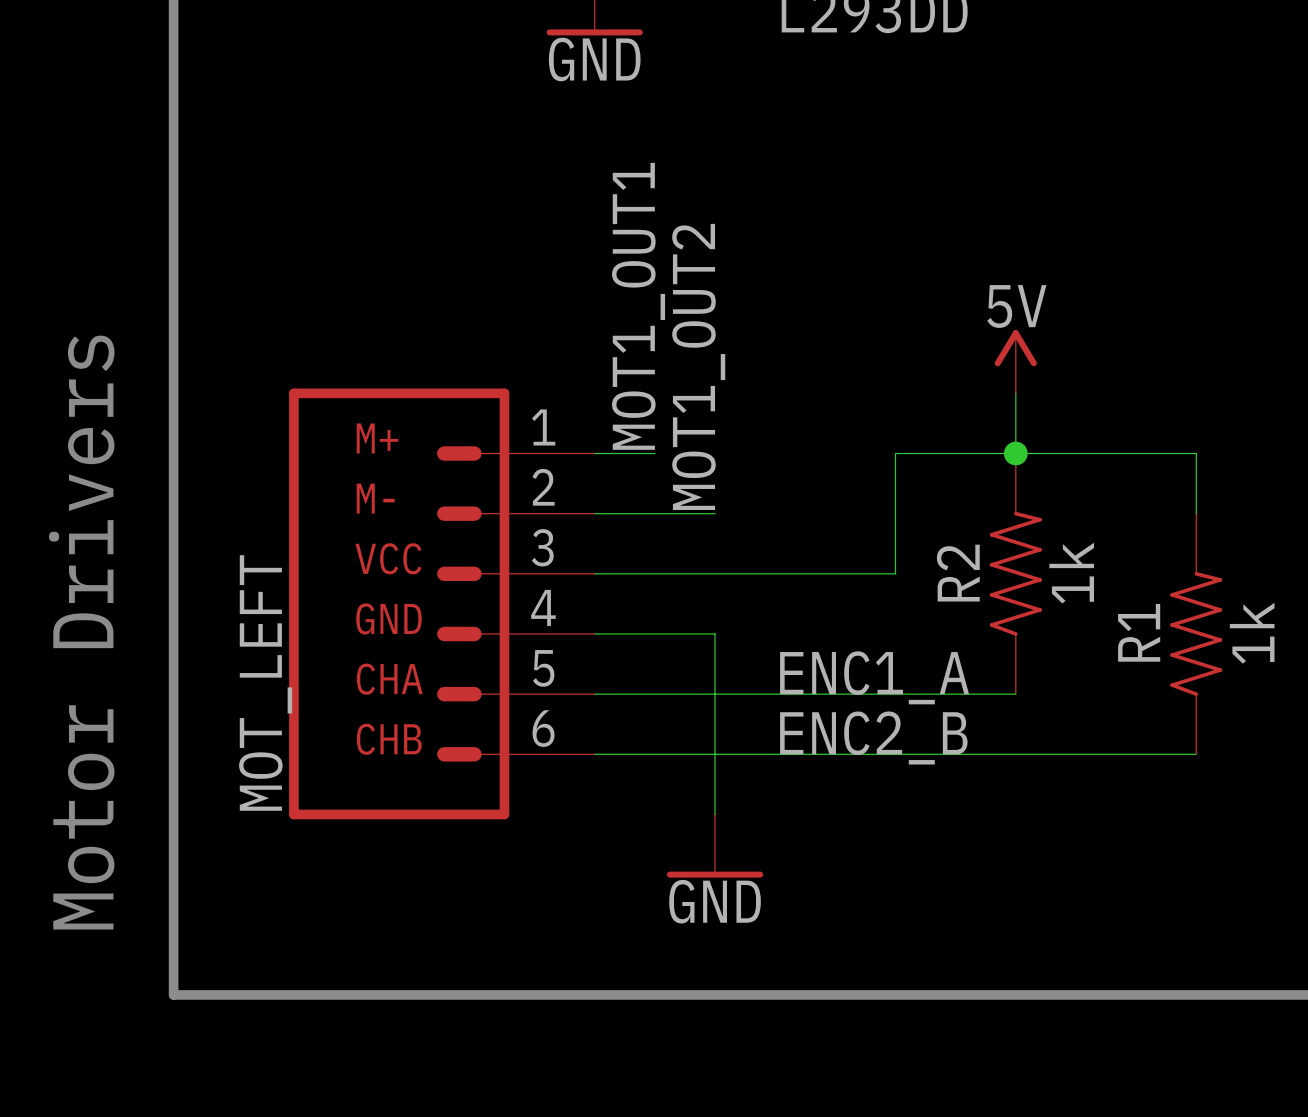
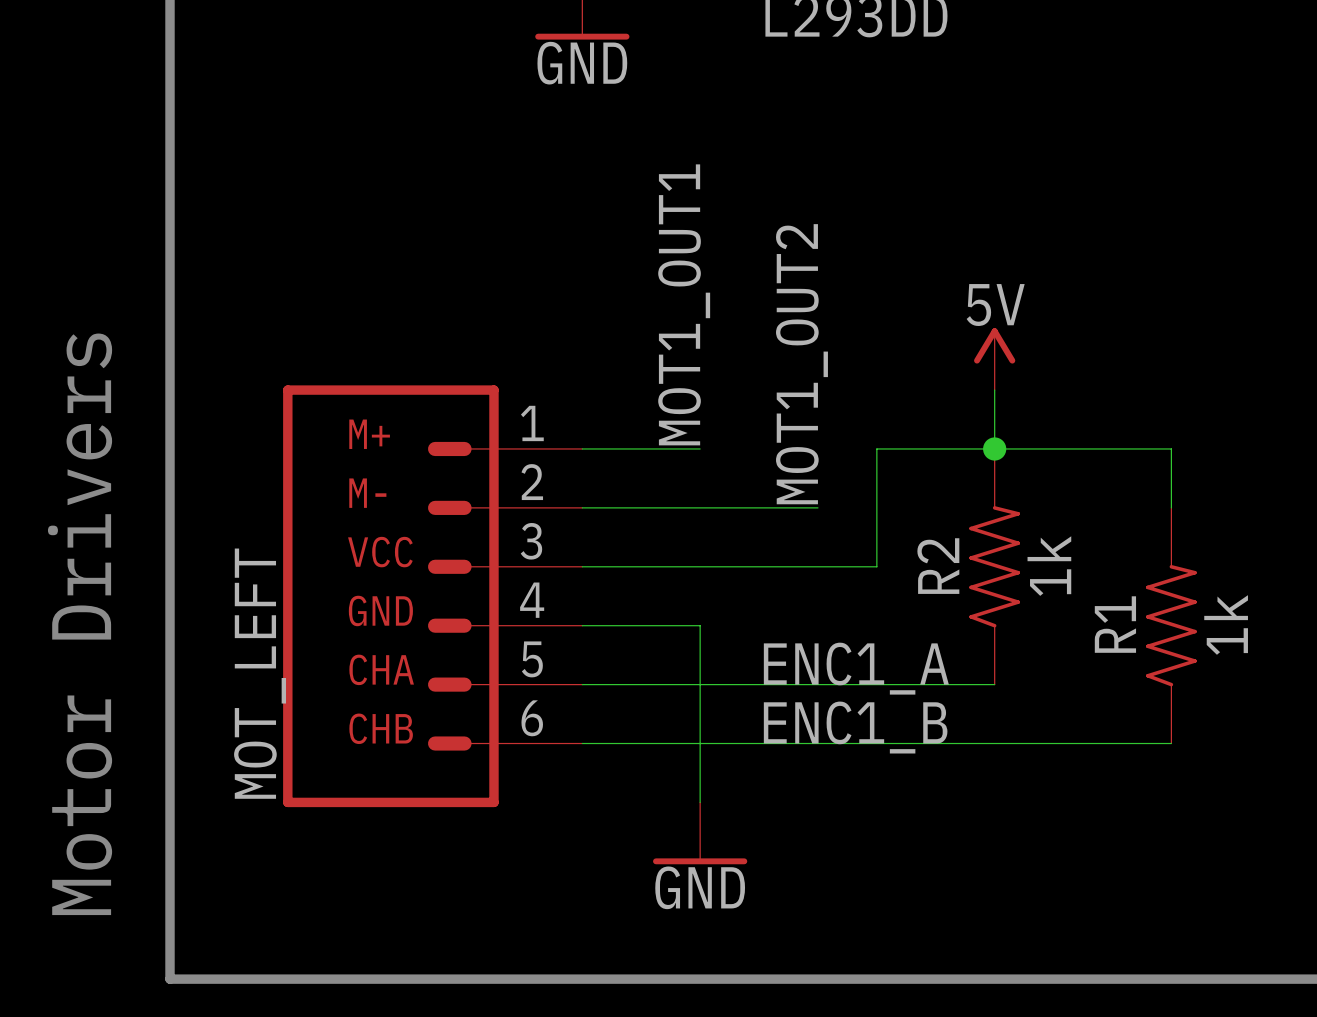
label position: MOT1_OUT1 (638, 306) -> MOT1_OUT1 (684, 304)
label position: MOT1_OUT2 (698, 366) -> MOT1_OUT2 (801, 364)
wire: none -> (641, 448) (700, 448)
wire: none -> (700, 507) (817, 507)
label: ENC2_B (873, 737) -> ENC1_B (855, 727)

